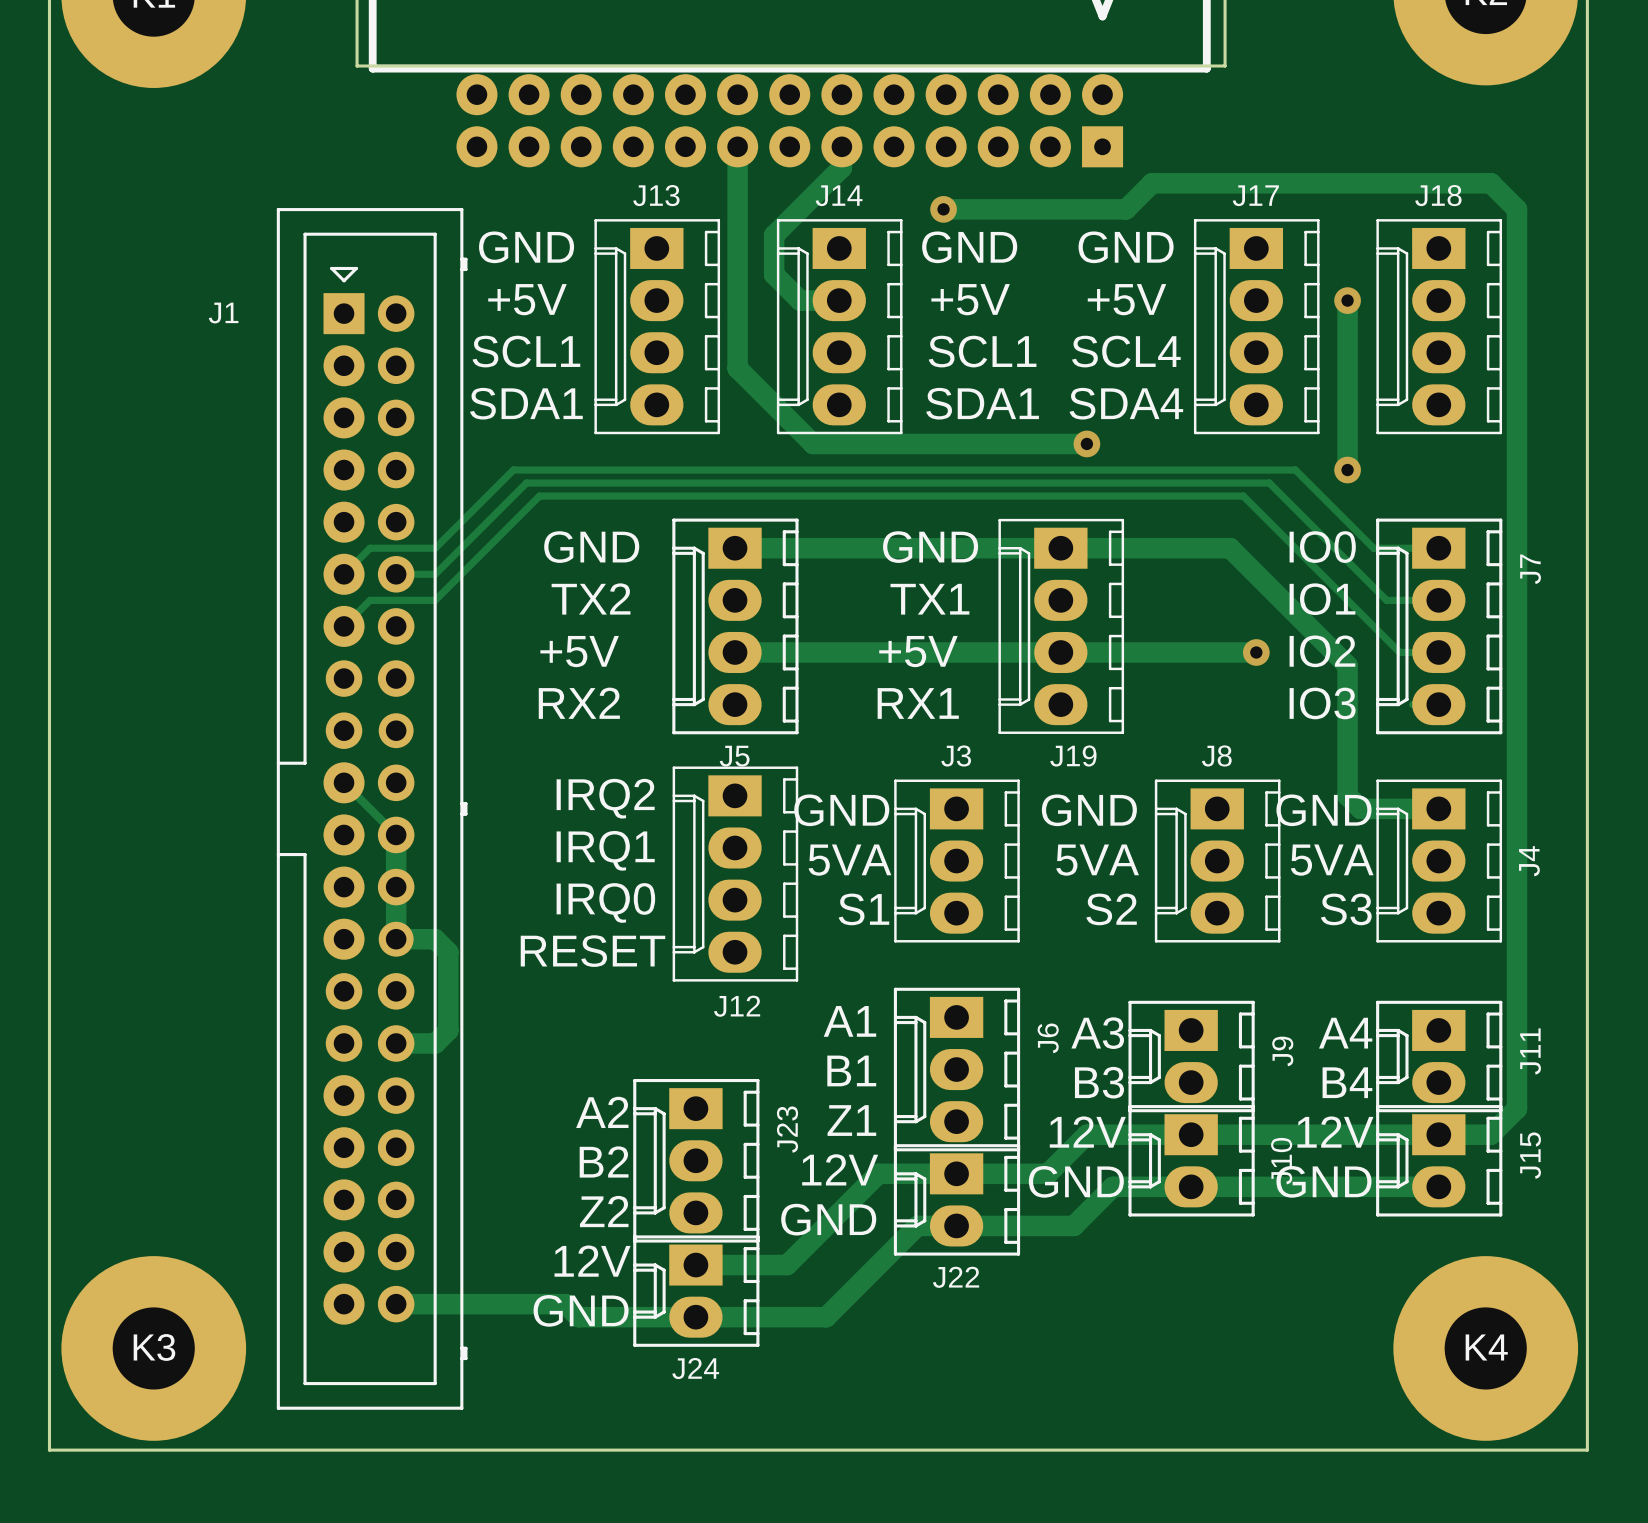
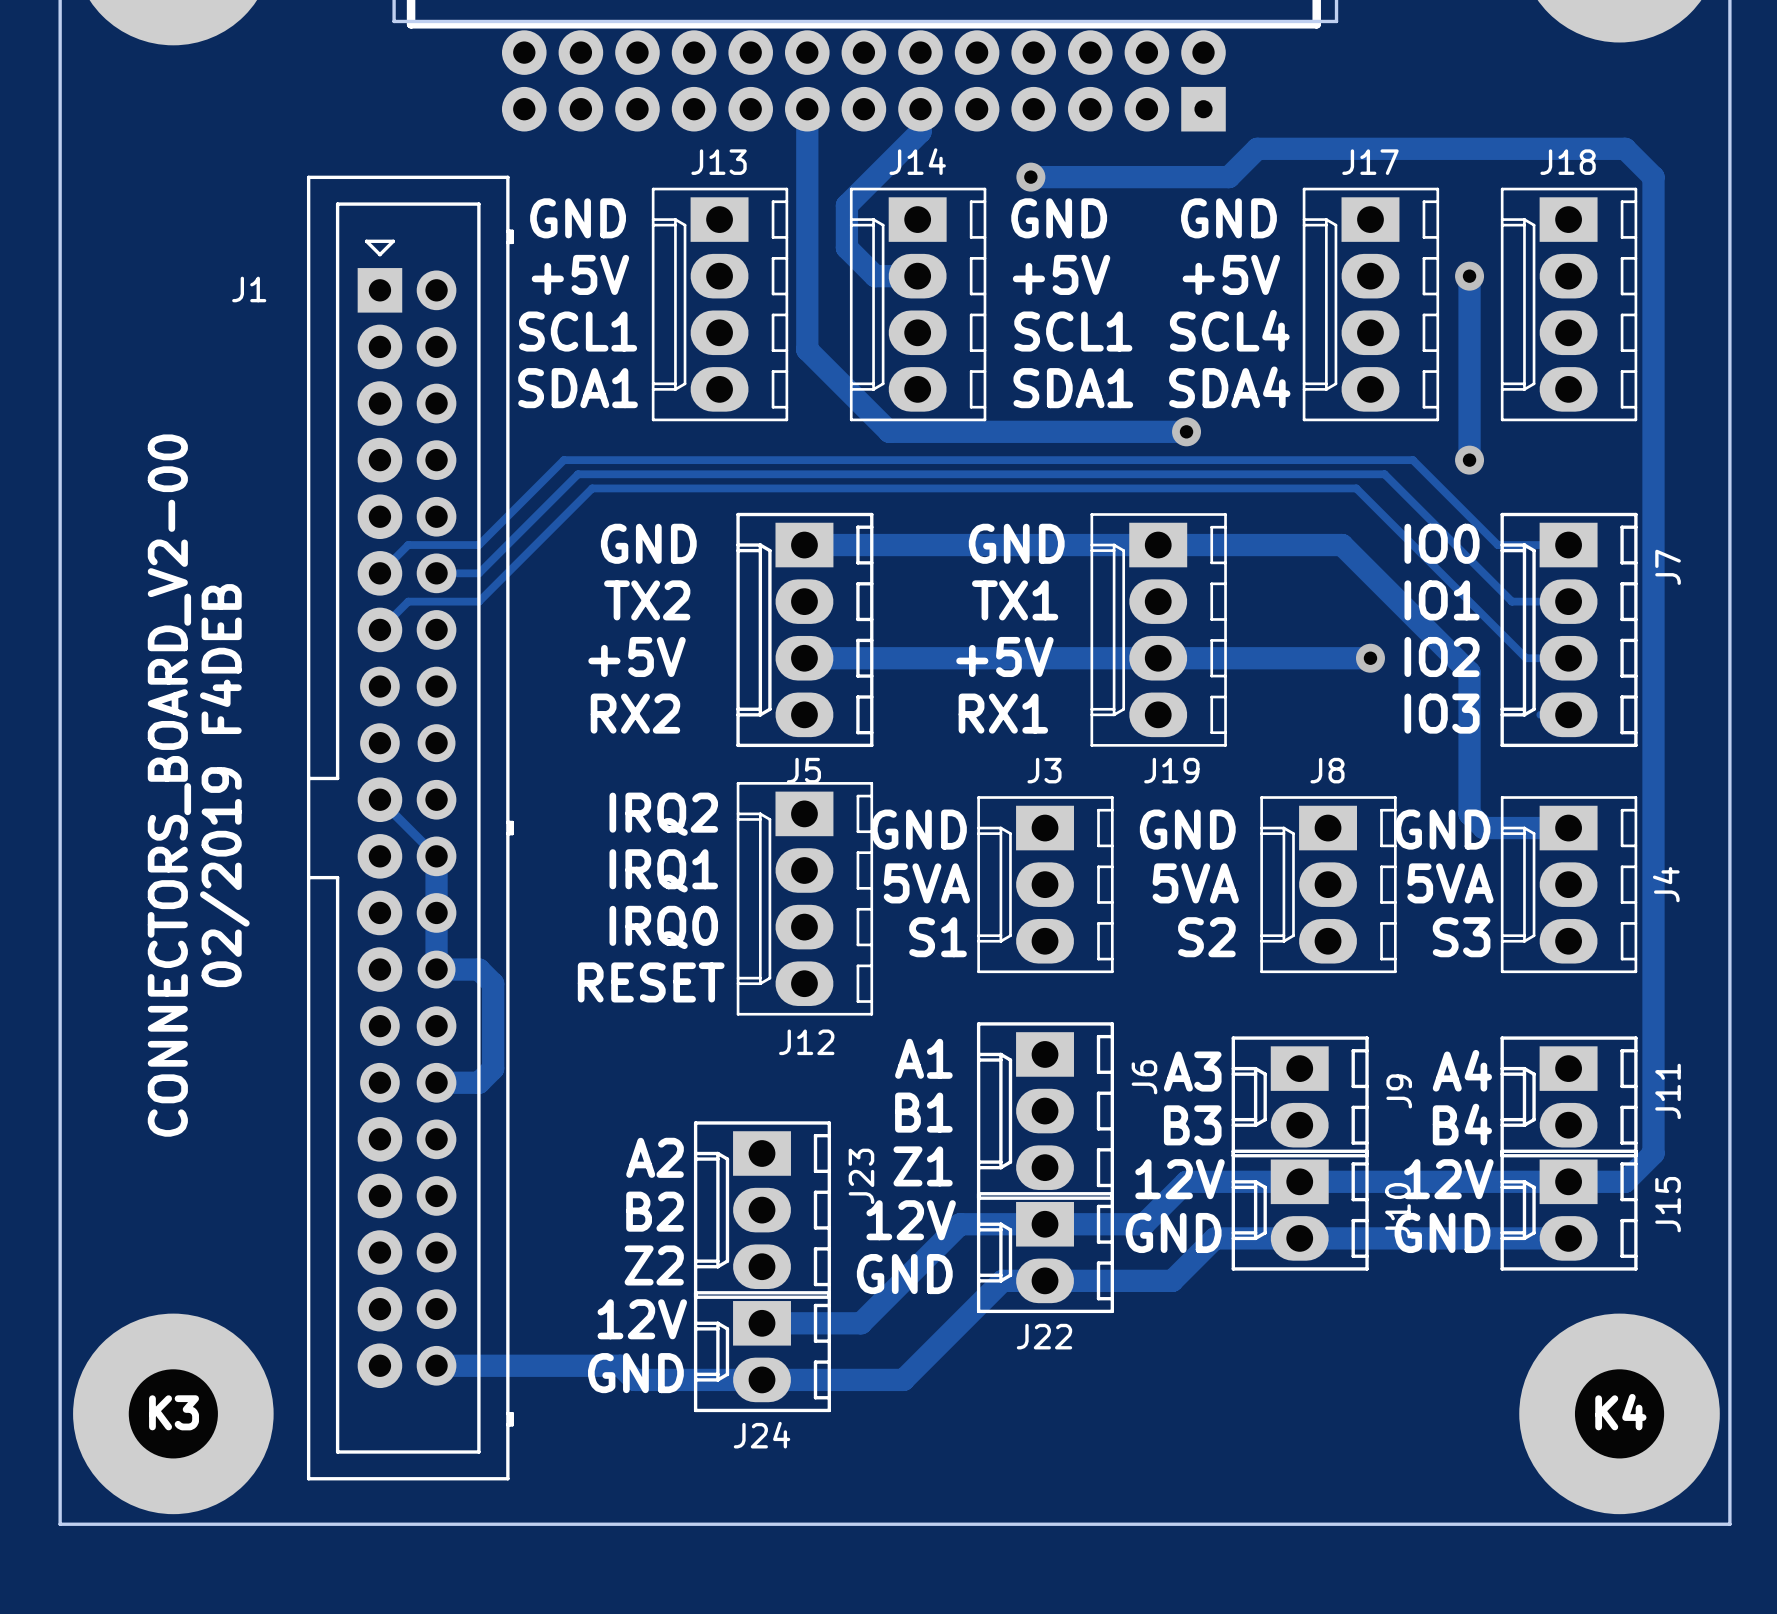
text: none -> CONNECTORS_BOARD_V2-00 (169, 785)
text: none -> 02/2019 F4DEB (224, 785)

